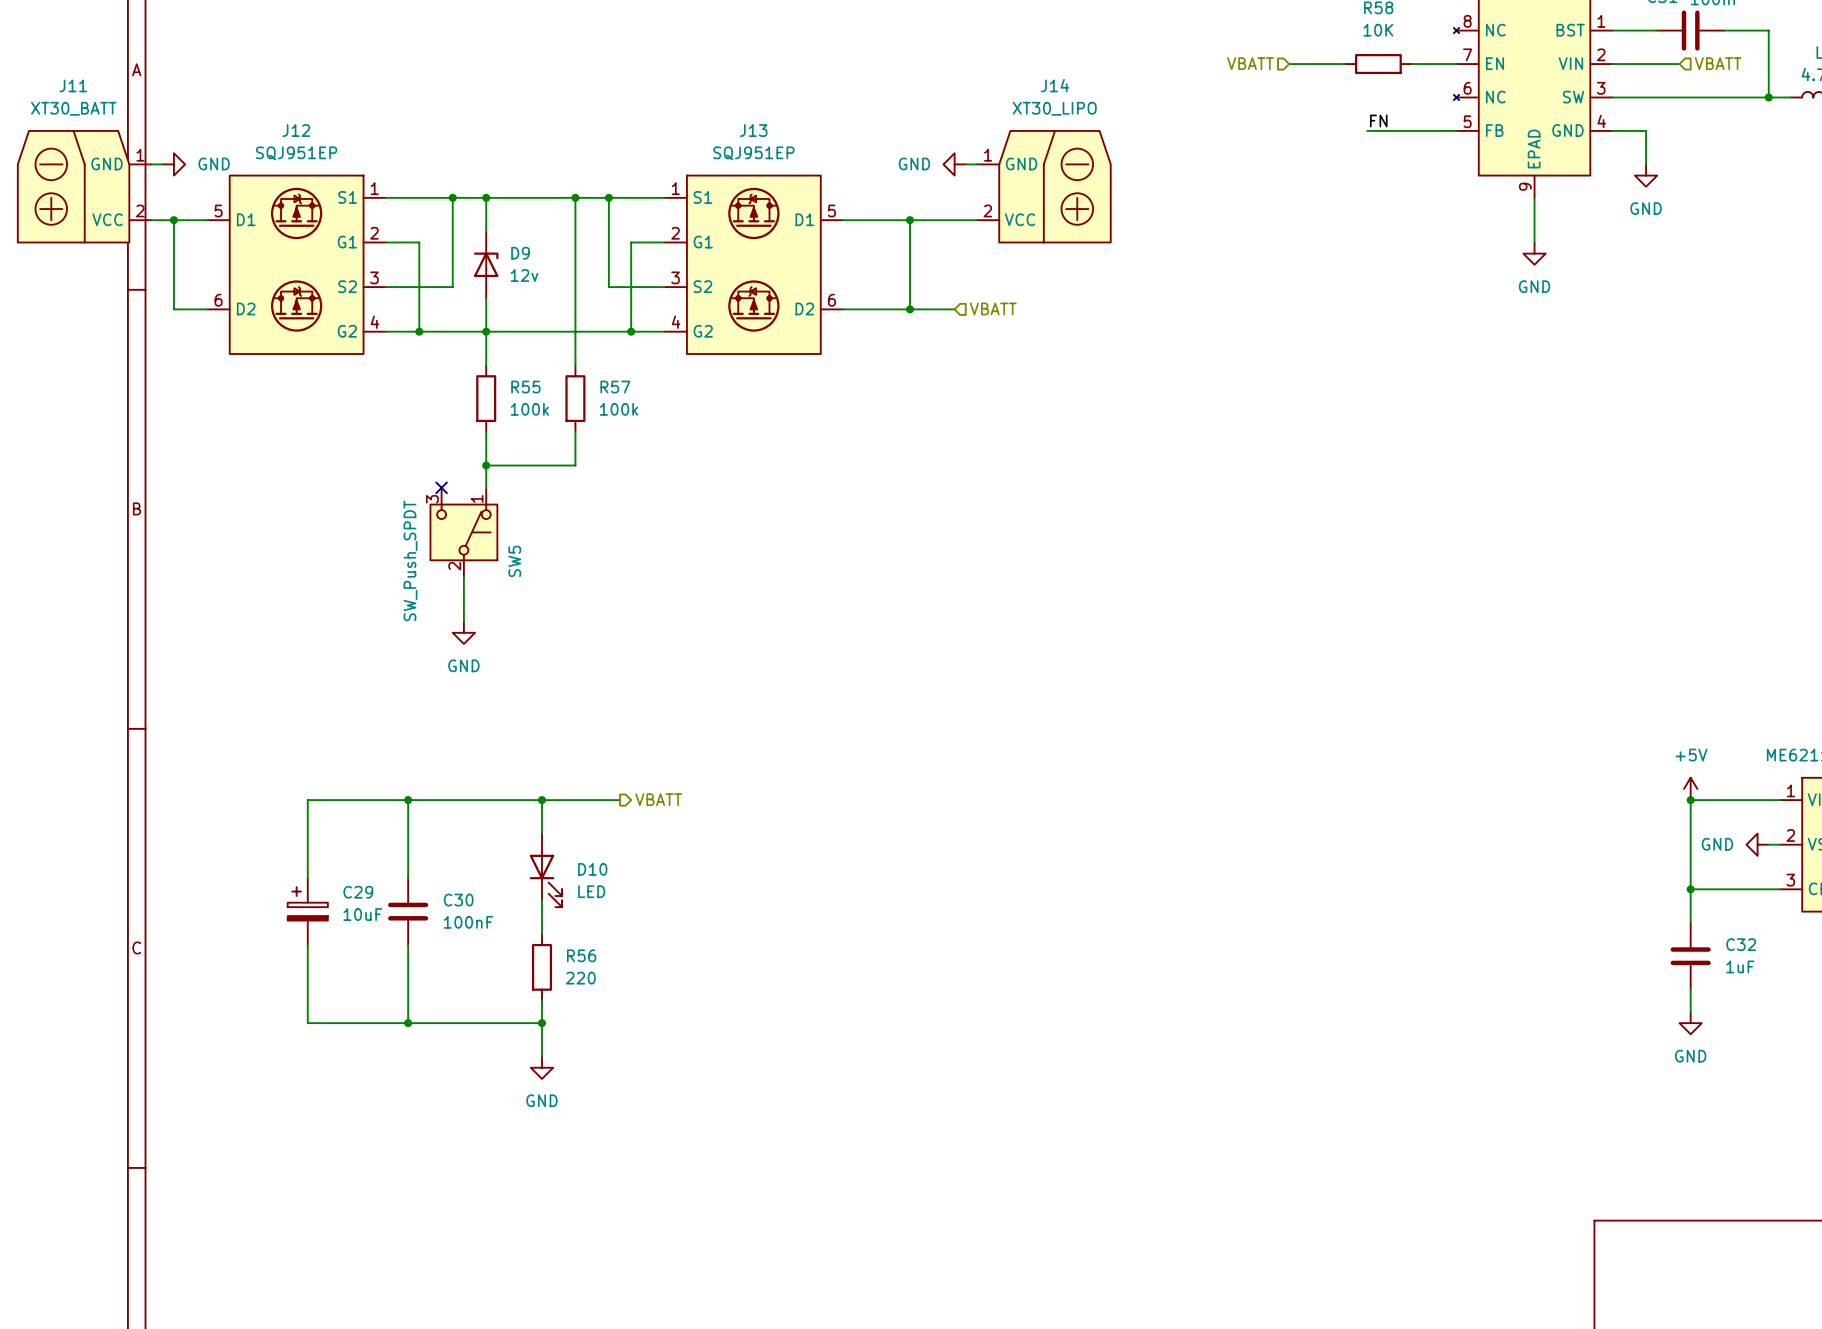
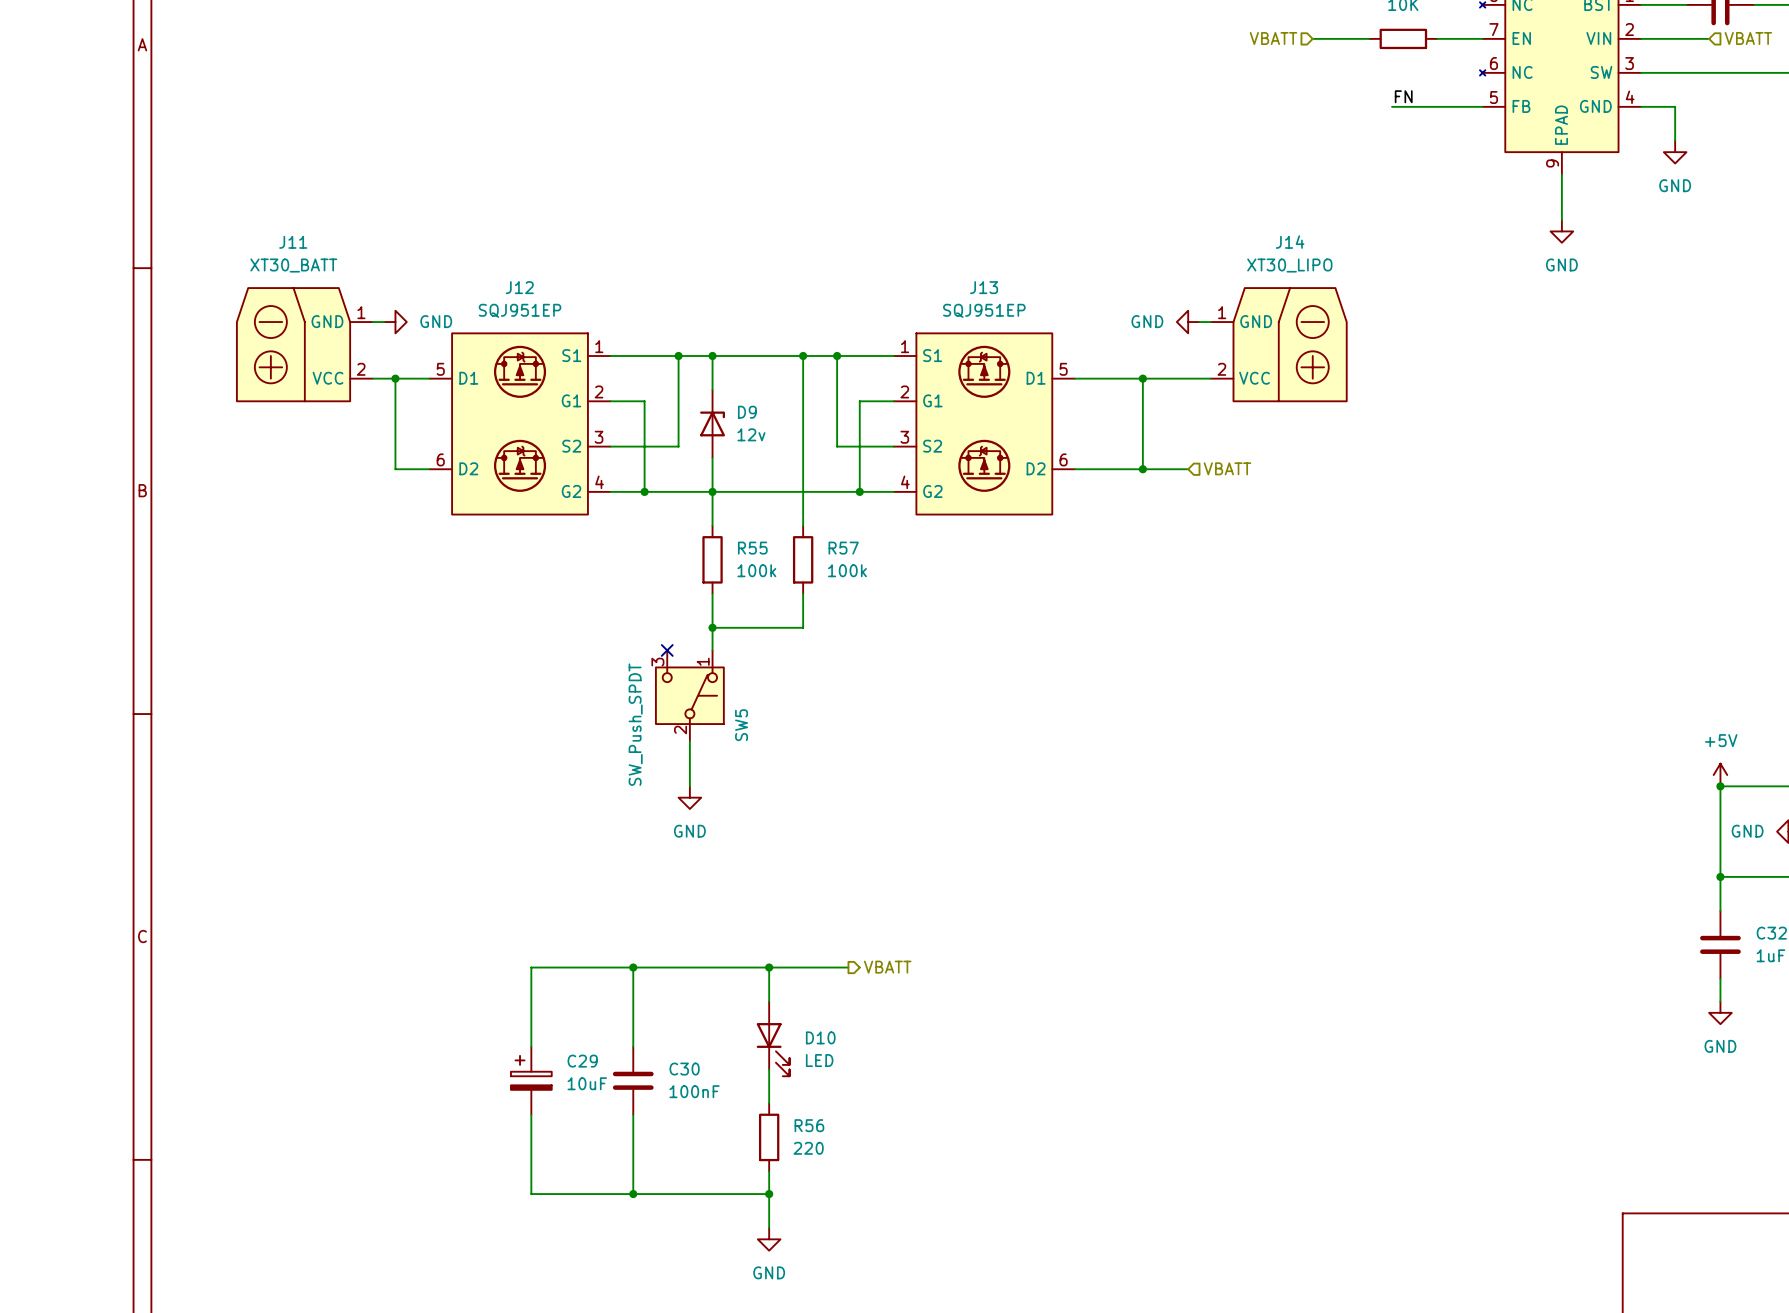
wire: (151, 164) (162, 164) -> none
power symbol: GND (173, 164) -> none
power symbol: GND (954, 164) -> none
wire: (965, 164) (976, 164) -> none
J11 position: (84, 186) -> (304, 344)
J14 position: (1043, 186) -> (1278, 344)
wire: (385, 197) (664, 197) -> none
wire: (452, 197) (452, 287) (385, 287) -> none
junction: (452, 197) -> none
wire: (486, 197) (486, 231) -> none
junction: (486, 197) -> none
wire: (575, 197) (575, 365) -> none
junction: (575, 197) -> none
wire: (608, 197) (608, 287) (664, 287) -> none
junction: (608, 197) -> none
wire: (151, 220) (207, 220) -> none
wire: (173, 220) (173, 309) (207, 309) -> none
junction: (173, 220) -> none
wire: (843, 220) (976, 220) -> none
wire: (910, 220) (910, 309) -> none
junction: (910, 220) -> none
wire: (385, 242) (419, 242) (419, 331) -> none
wire: (664, 242) (631, 242) (631, 331) -> none
J12 position: (296, 264) -> (520, 423)
D9 position: (486, 264) -> (712, 423)
J13 position: (753, 264) -> (984, 423)
wire: (486, 298) (486, 365) -> none
hierarchical label: VBATT (993, 308) -> none
wire: (843, 309) (954, 309) -> none
junction: (910, 309) -> none
wire: (385, 331) (664, 331) -> (610, 356) (893, 356)
junction: (419, 331) -> none
junction: (486, 331) -> none
junction: (631, 331) -> none
wire: none -> (372, 322) (384, 322)
power symbol: none -> GND (395, 322)
power symbol: none -> GND (1188, 322)
wire: none -> (1199, 322) (1210, 322)
wire: none -> (678, 356) (678, 446) (610, 446)
junction: none -> (678, 356)
wire: none -> (712, 356) (712, 389)
junction: none -> (712, 356)
wire: none -> (803, 356) (803, 525)
junction: none -> (803, 356)
wire: none -> (837, 356) (837, 446) (893, 446)
junction: none -> (837, 356)
wire: none -> (372, 378) (429, 378)
wire: none -> (395, 378) (395, 469) (429, 469)
junction: none -> (395, 378)
R55 position: (486, 398) -> (712, 559)
R57 position: (575, 398) -> (803, 559)
wire: none -> (1074, 378) (1210, 378)
wire: none -> (1142, 378) (1142, 469)
junction: none -> (1142, 378)
wire: none -> (610, 401) (644, 401) (644, 491)
wire: none -> (893, 401) (859, 401) (859, 491)
junction: (486, 465) -> none
wire: none -> (712, 457) (712, 525)
no-connect mark: (441, 487) -> none
wire: none -> (1074, 469) (1188, 469)
junction: none -> (1142, 469)
hierarchical label: none -> VBATT (1227, 468)
wire: none -> (610, 491) (893, 491)
junction: none -> (644, 491)
junction: none -> (712, 491)
junction: none -> (859, 491)
SW5 position: (463, 532) -> (689, 695)
wire: (463, 577) (463, 621) -> none
wire: none -> (712, 593) (712, 650)
wire: none -> (803, 593) (803, 627) (712, 627)
power symbol: GND (463, 632) -> none
junction: none -> (712, 627)
no-connect mark: none -> (667, 650)
wire: none -> (689, 741) (689, 786)
hierarchical label: VBATT (658, 799) -> none
wire: (408, 800) (408, 878) -> none
junction: (408, 800) -> none
wire: (541, 800) (541, 833) -> none
junction: (541, 800) -> none
wire: (620, 800) (307, 800) (307, 878) -> none
power symbol: none -> GND (689, 797)
D10 position: (545, 870) -> (773, 1038)
wire: (541, 900) (541, 933) -> none
C29 position: (307, 911) -> (531, 1080)
C30 position: (408, 911) -> (633, 1080)
wire: (307, 945) (307, 1023) (541, 1023) -> none
wire: (408, 945) (408, 1023) -> (633, 967) (633, 1046)
R56 position: (541, 967) -> (769, 1137)
junction: none -> (633, 967)
wire: none -> (769, 967) (769, 1001)
junction: none -> (769, 967)
wire: none -> (848, 967) (531, 967) (531, 1046)
hierarchical label: none -> VBATT (887, 967)
wire: (541, 1000) (541, 1056) -> none
junction: (408, 1023) -> none
junction: (541, 1023) -> none
power symbol: GND (541, 1067) -> none
wire: none -> (769, 1069) (769, 1103)
wire: none -> (531, 1114) (531, 1194) (769, 1194)
wire: none -> (633, 1114) (633, 1194)
wire: none -> (769, 1171) (769, 1228)
junction: none -> (633, 1194)
junction: none -> (769, 1194)
power symbol: none -> GND (769, 1239)

